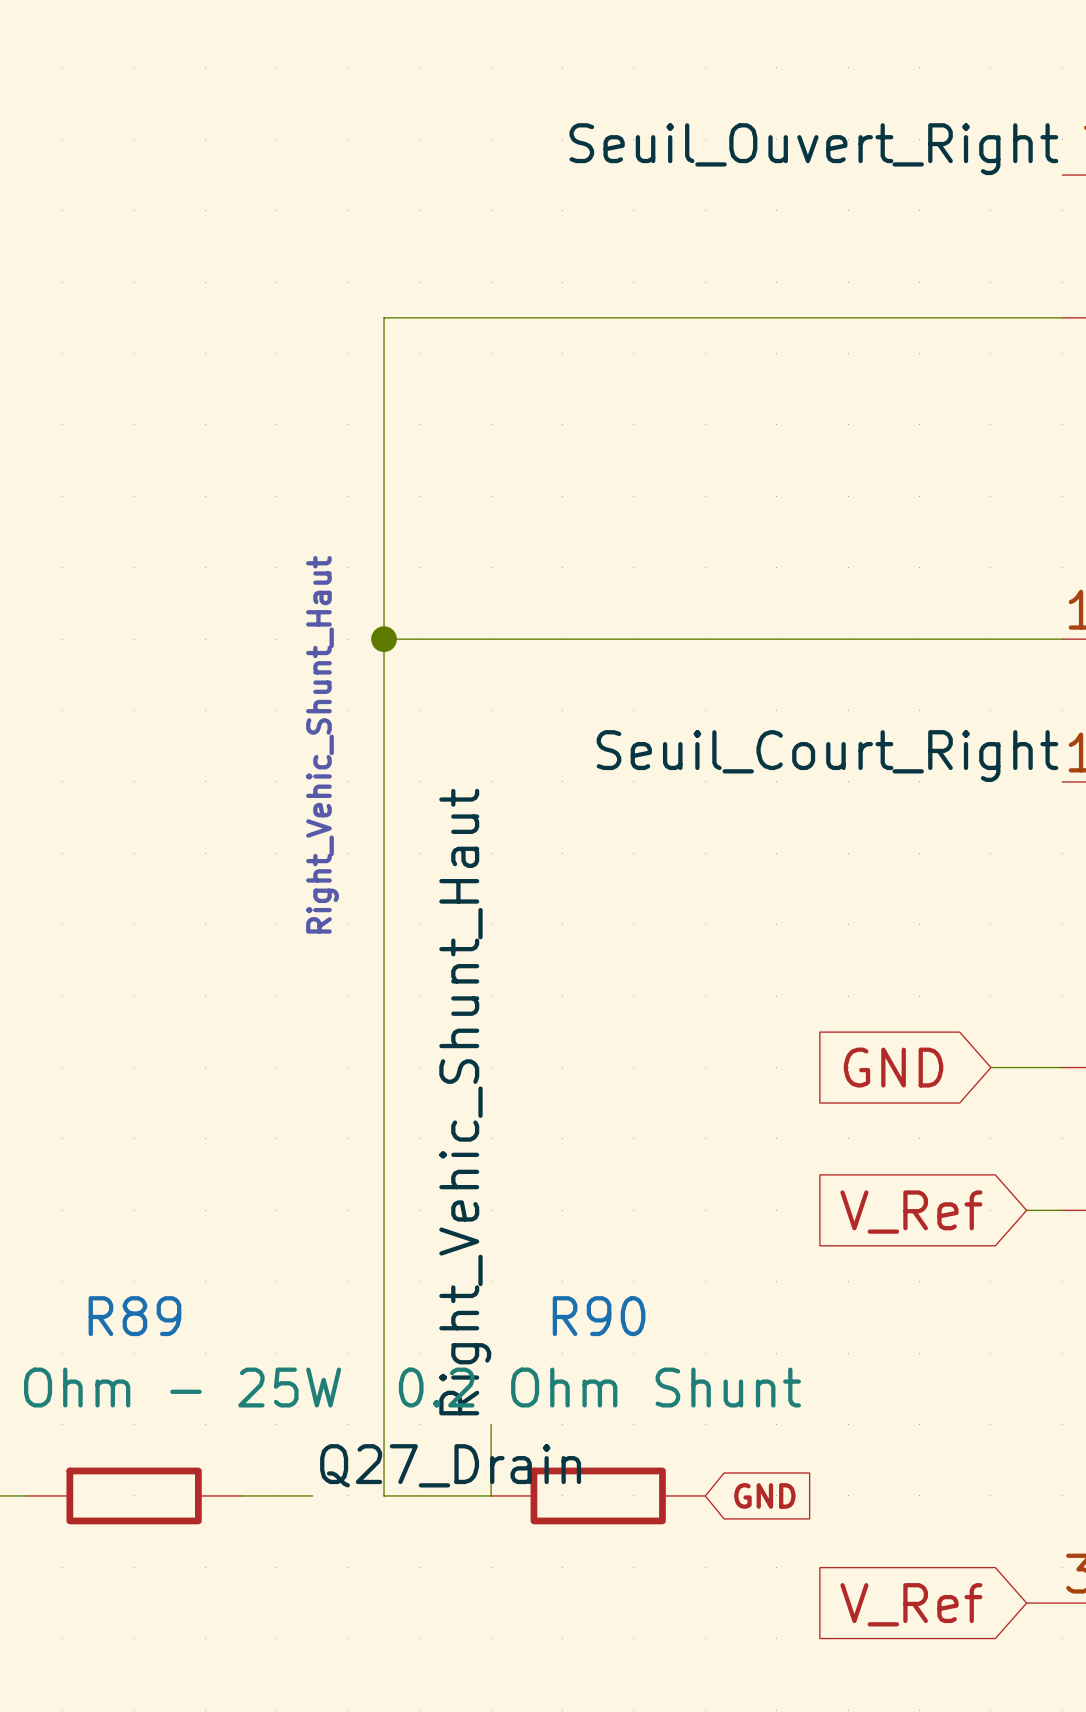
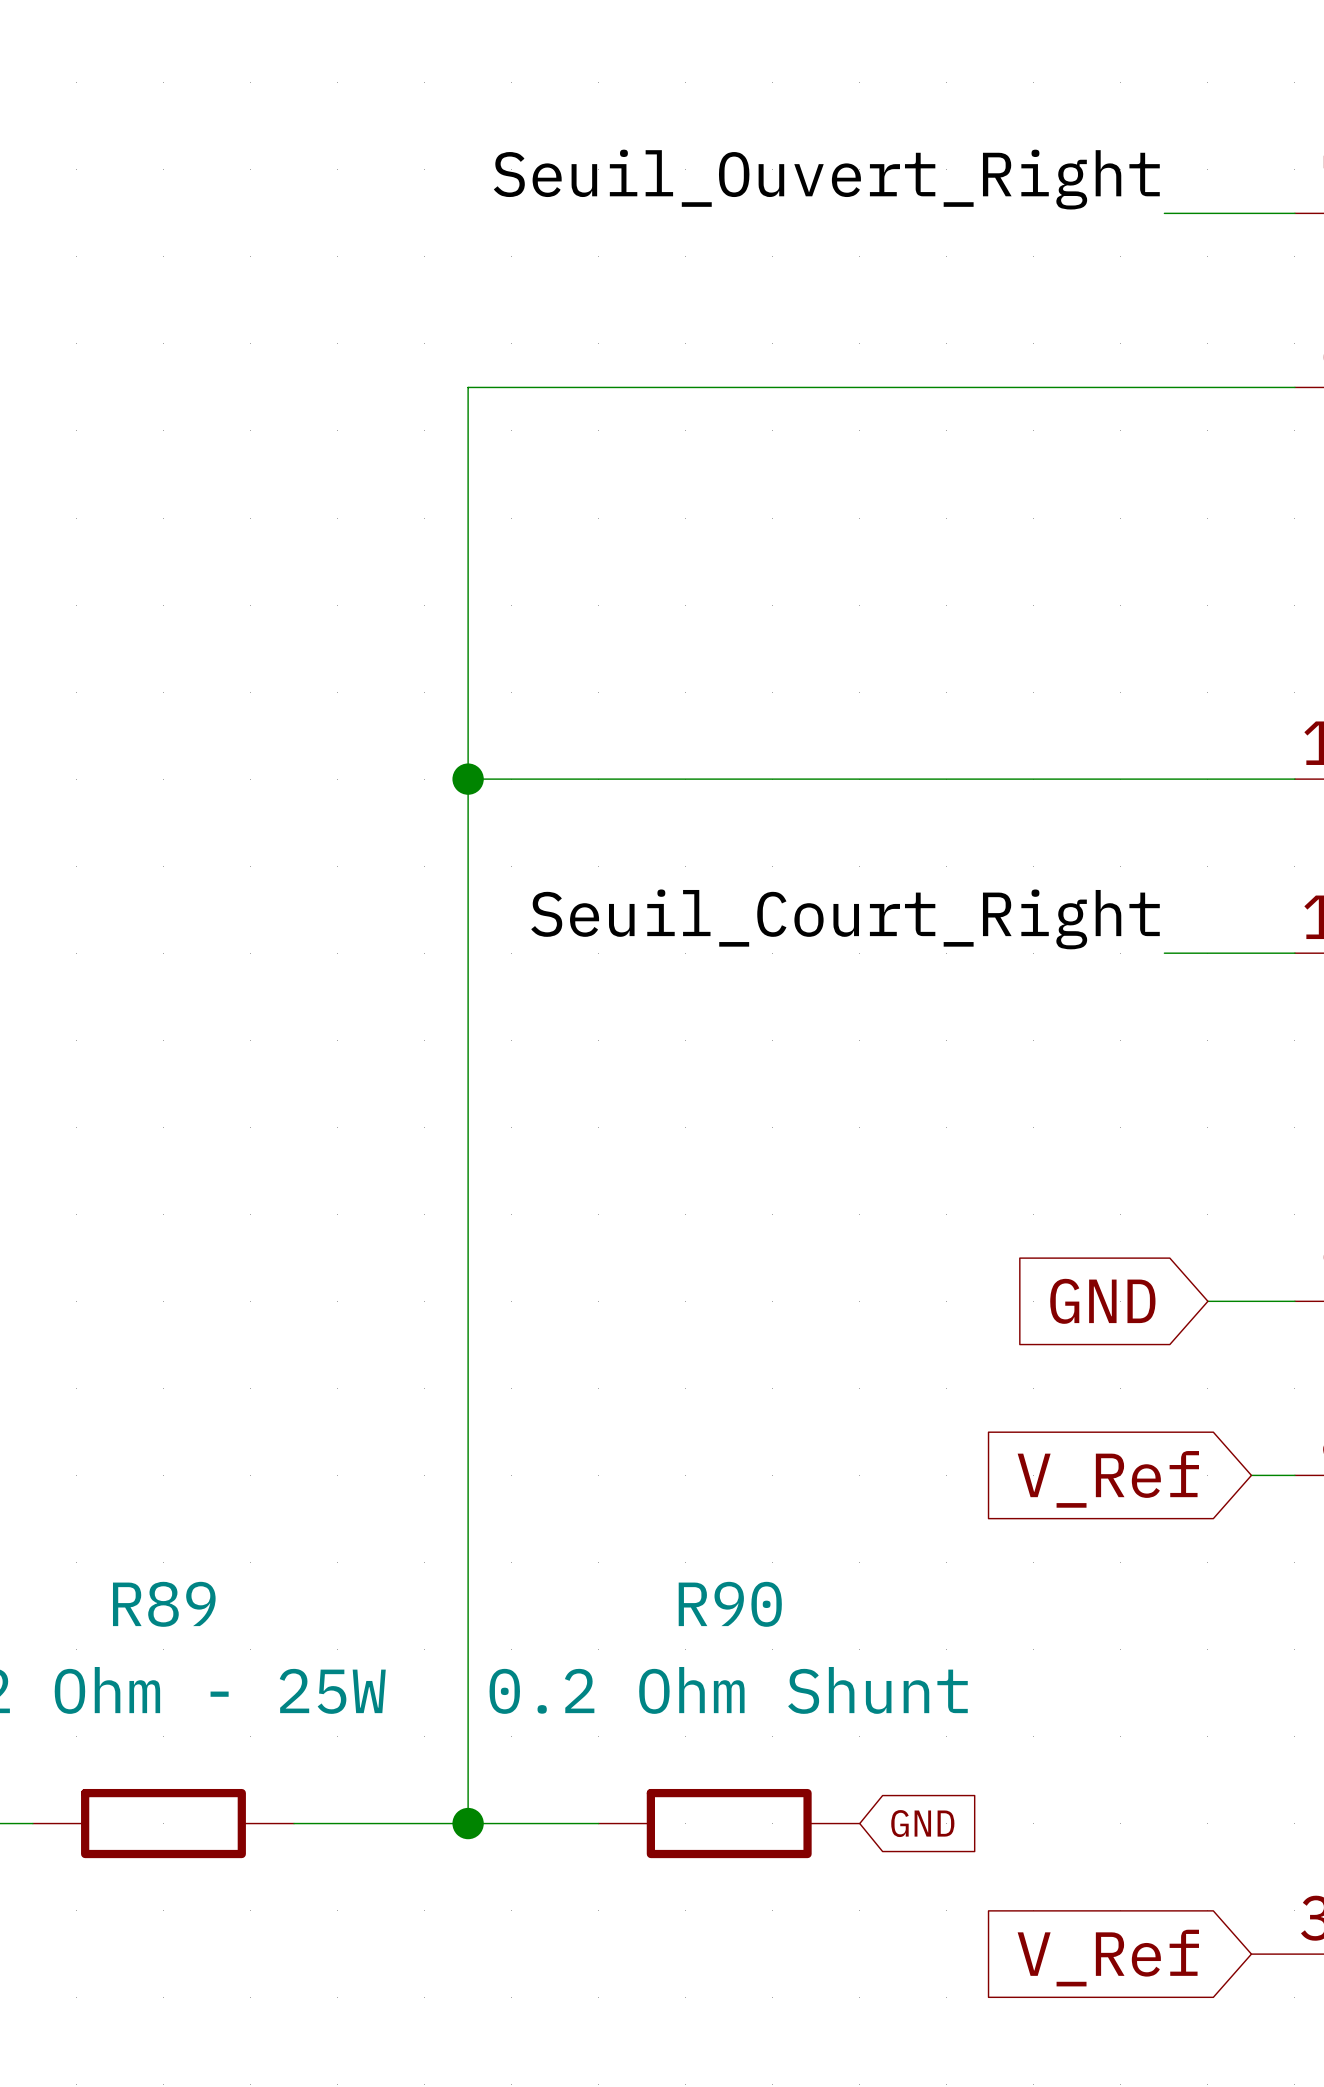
label position: Seuil_Ouvert_Right (813, 149) -> Seuil_Ouvert_Right (826, 179)
wire: none -> (1164, 213) (1294, 213)
text: Right_Vehic_Shunt_Haut (322, 744) -> none
label position: Seuil_Court_Right (827, 756) -> Seuil_Court_Right (845, 919)
wire: none -> (1164, 953) (1294, 953)
label: Right_Vehic_Shunt_Haut (465, 1102) -> none
wire: (491, 1424) (491, 1495) -> none
label: Q27_Drain (450, 1465) -> none
wire: none -> (381, 1823) (468, 1823)
junction: none -> (468, 1823)

